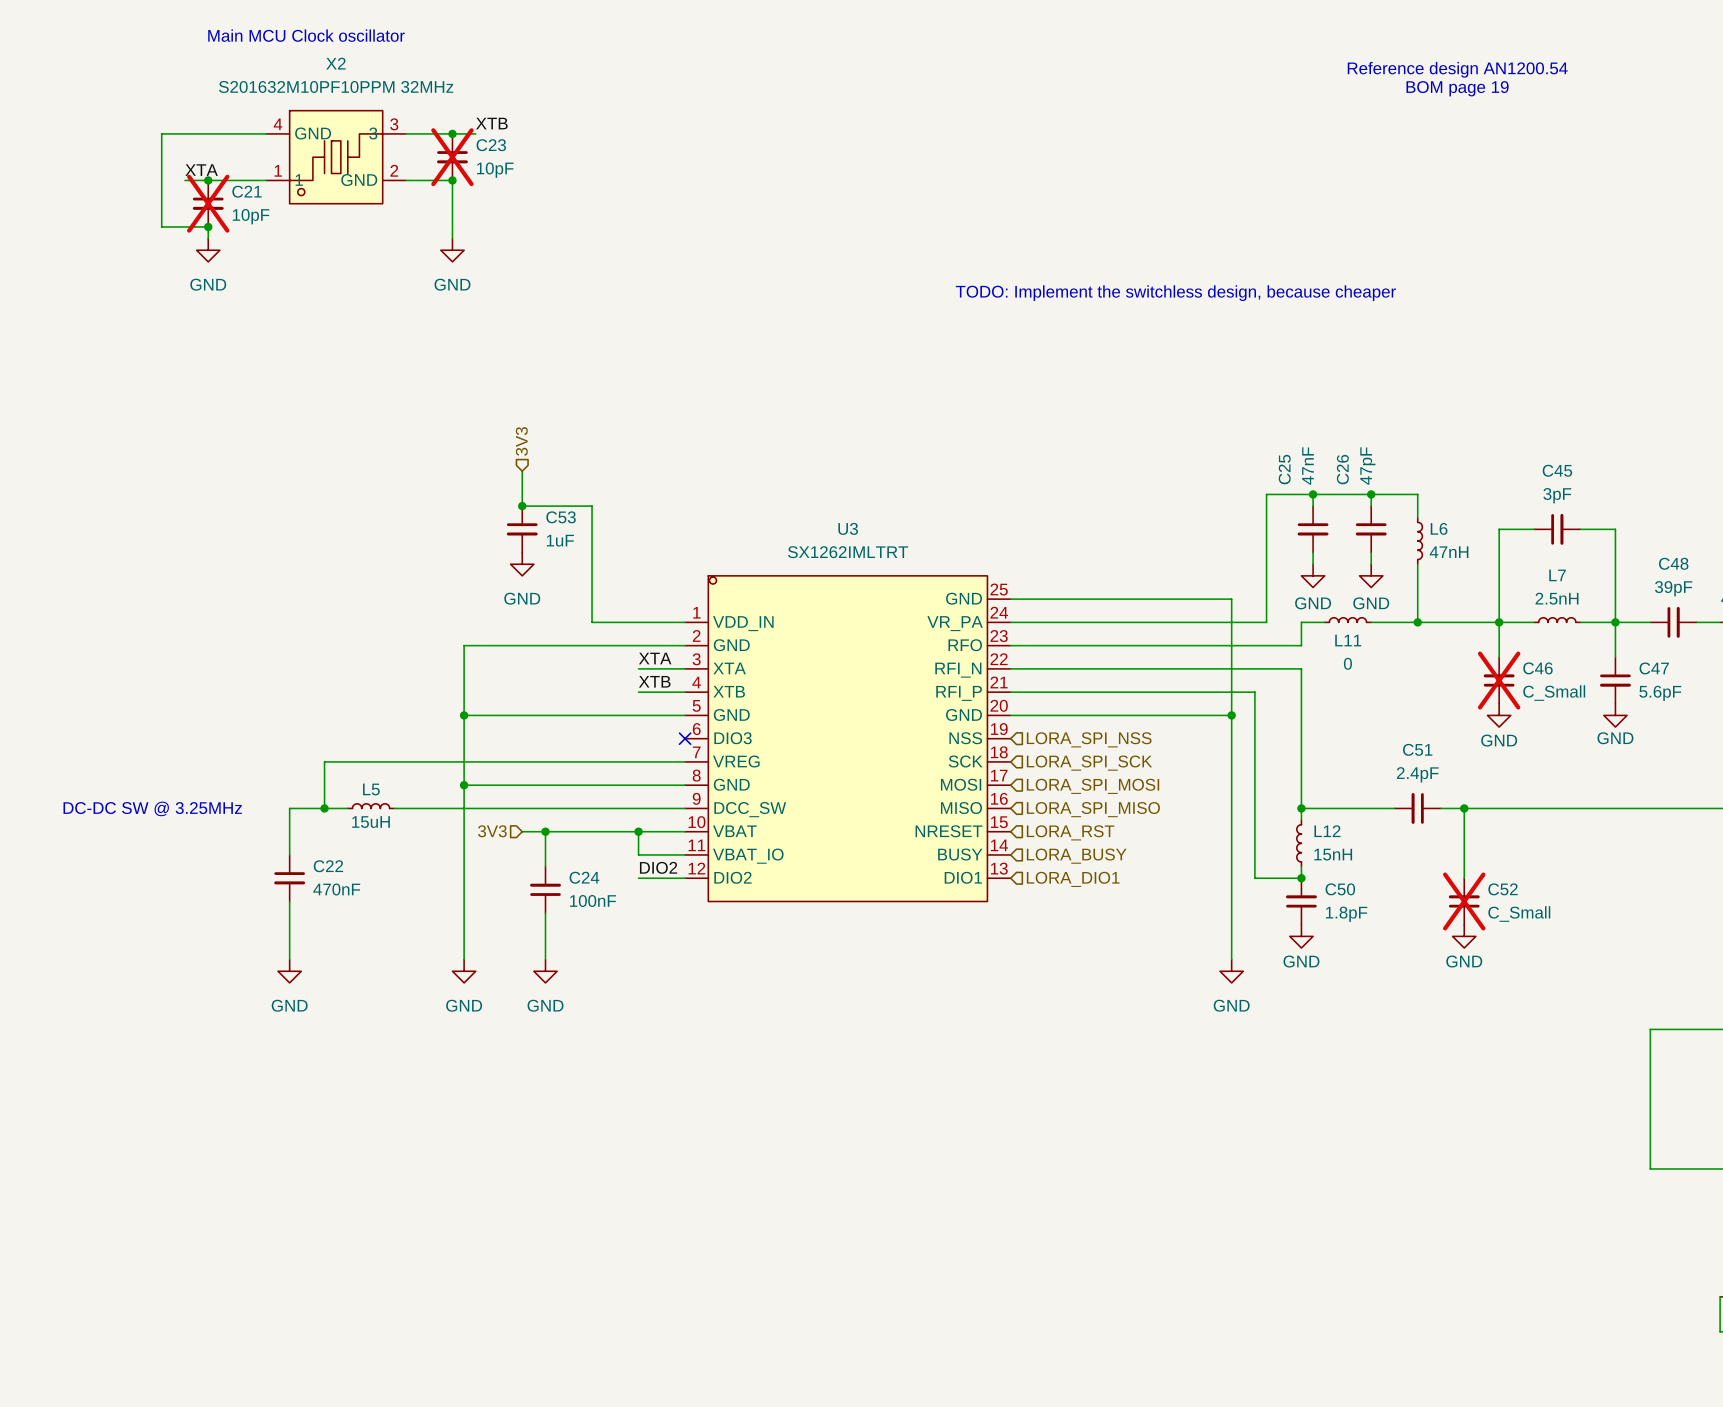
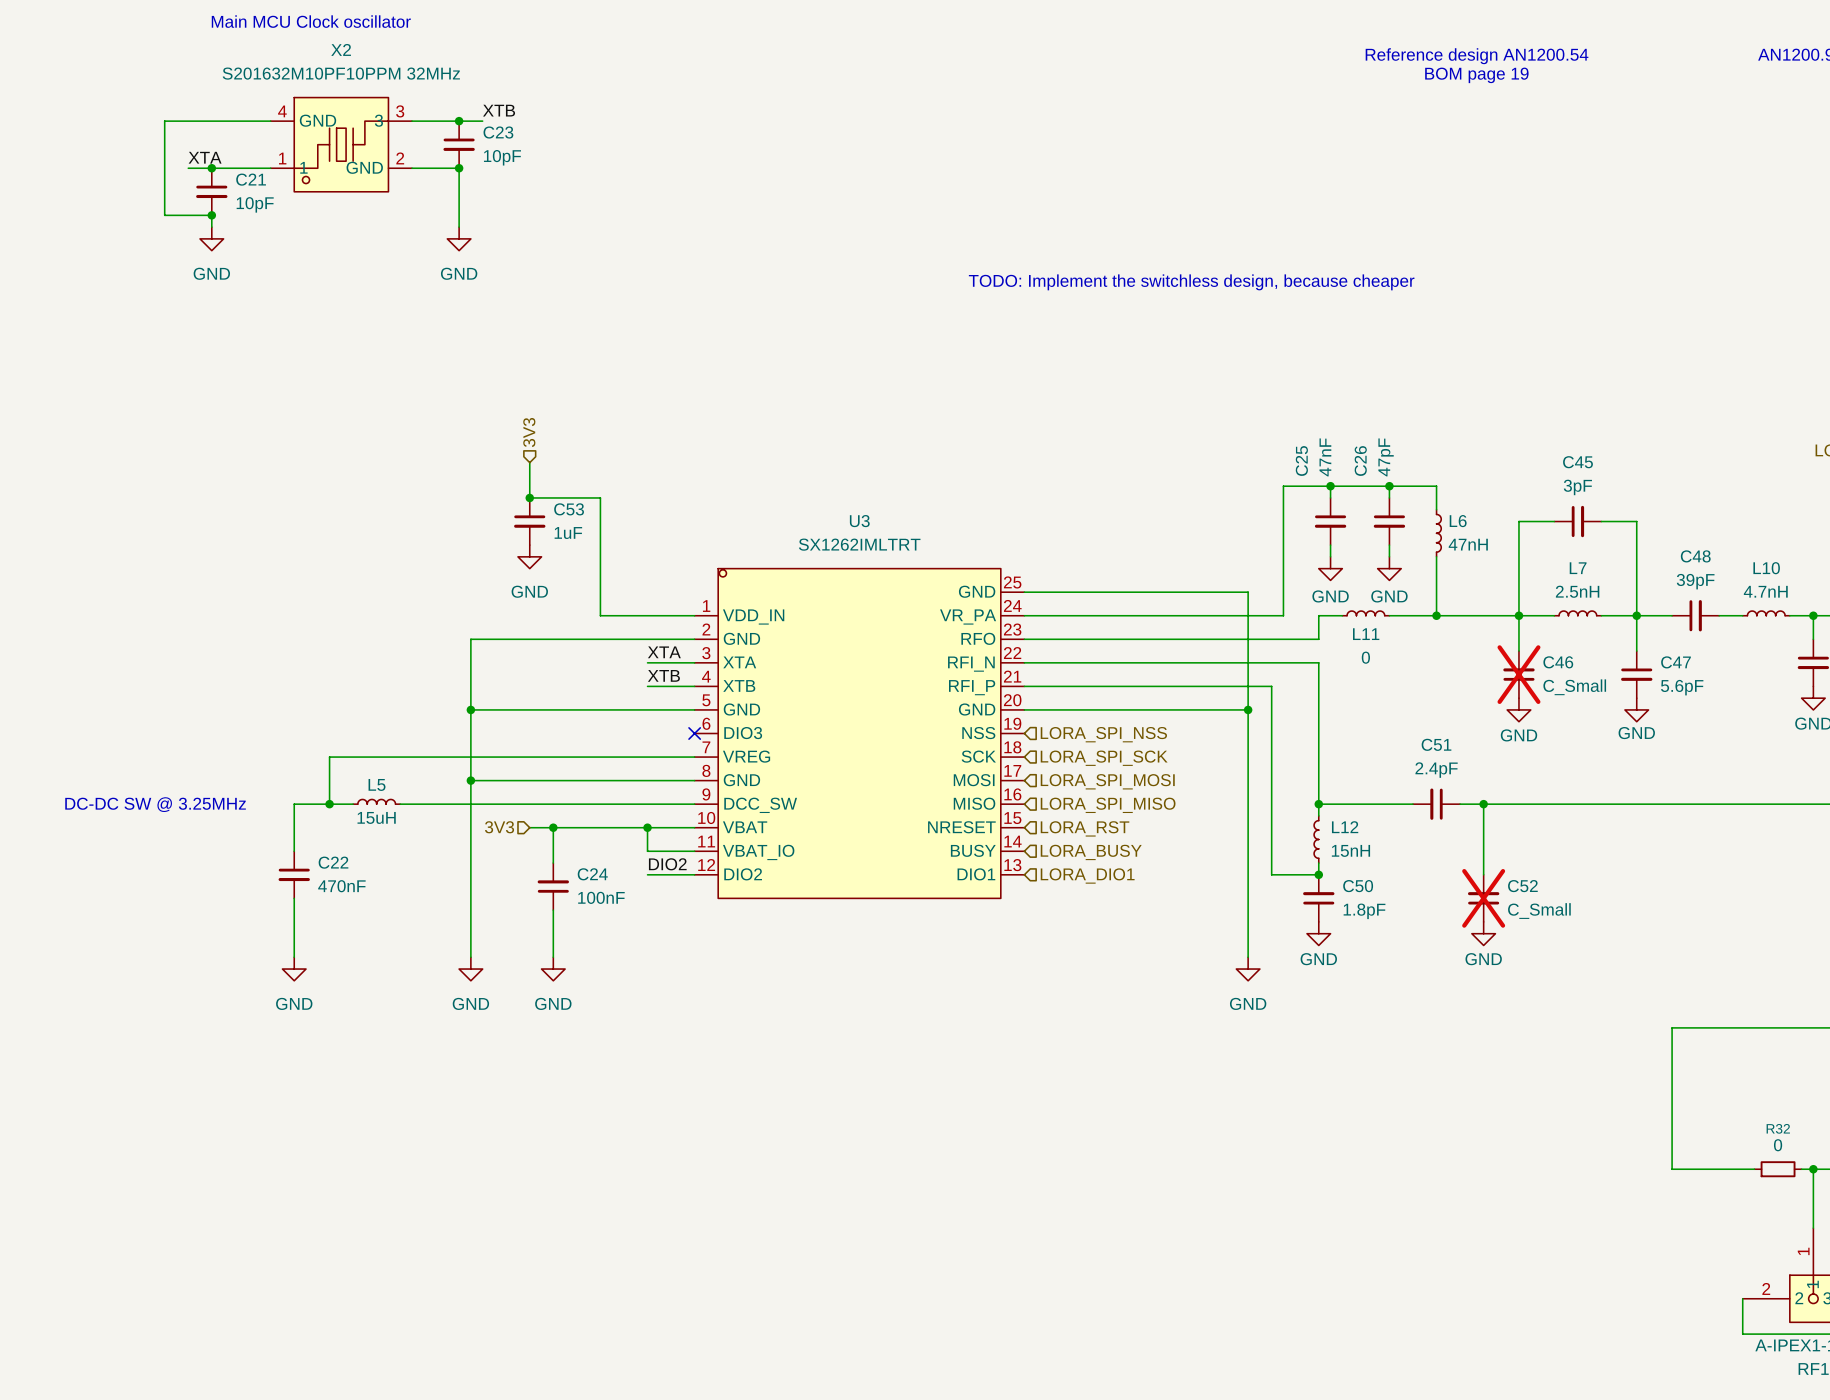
C23 do-not-place cross: (452, 157) -> none
C21 do-not-place cross: (208, 203) -> none

